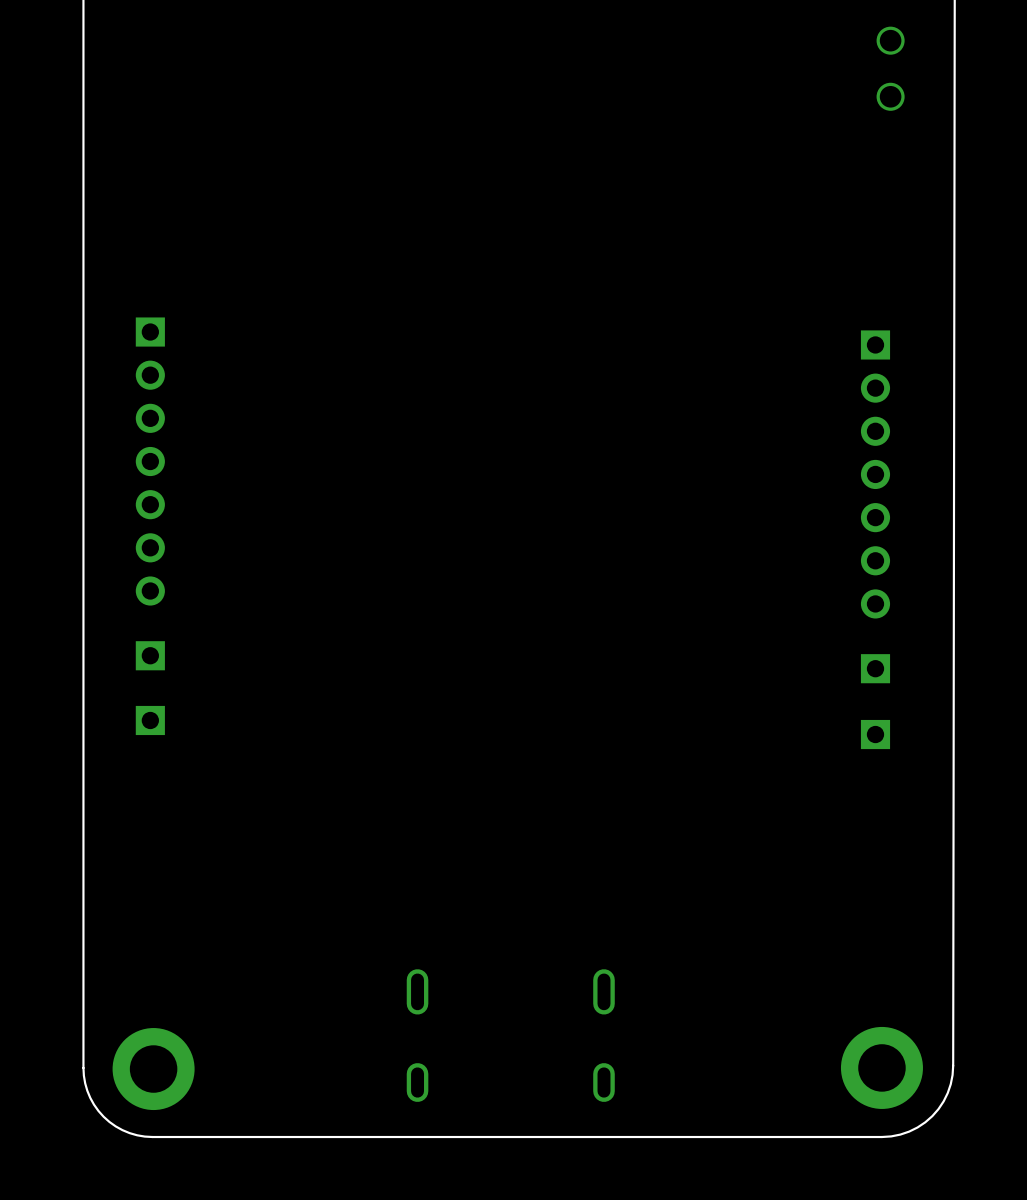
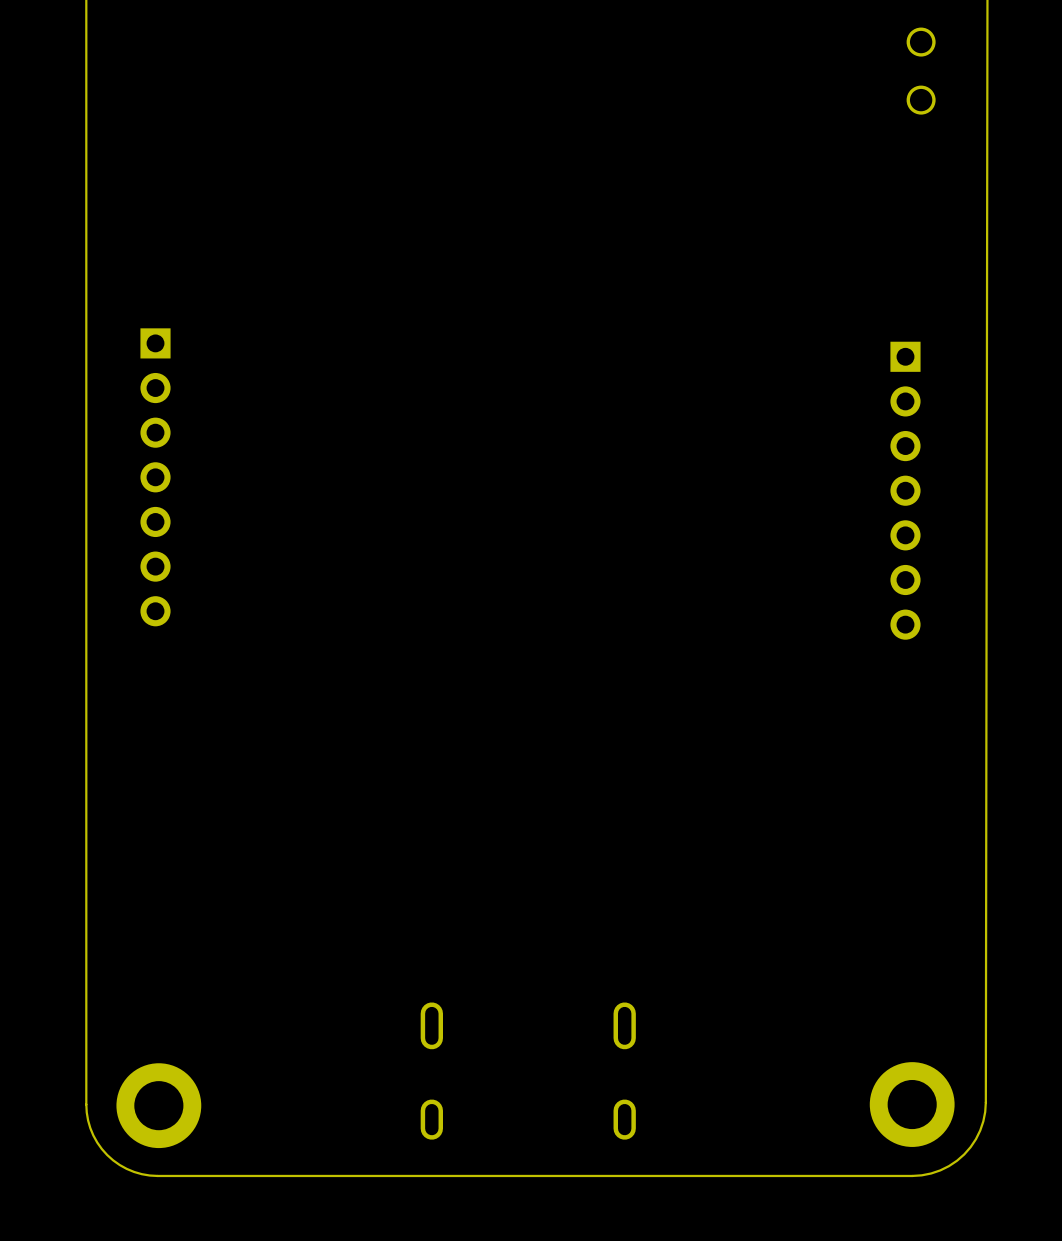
part: (150, 655) -> none
part: (875, 668) -> none
part: (150, 720) -> none
part: (875, 734) -> none

